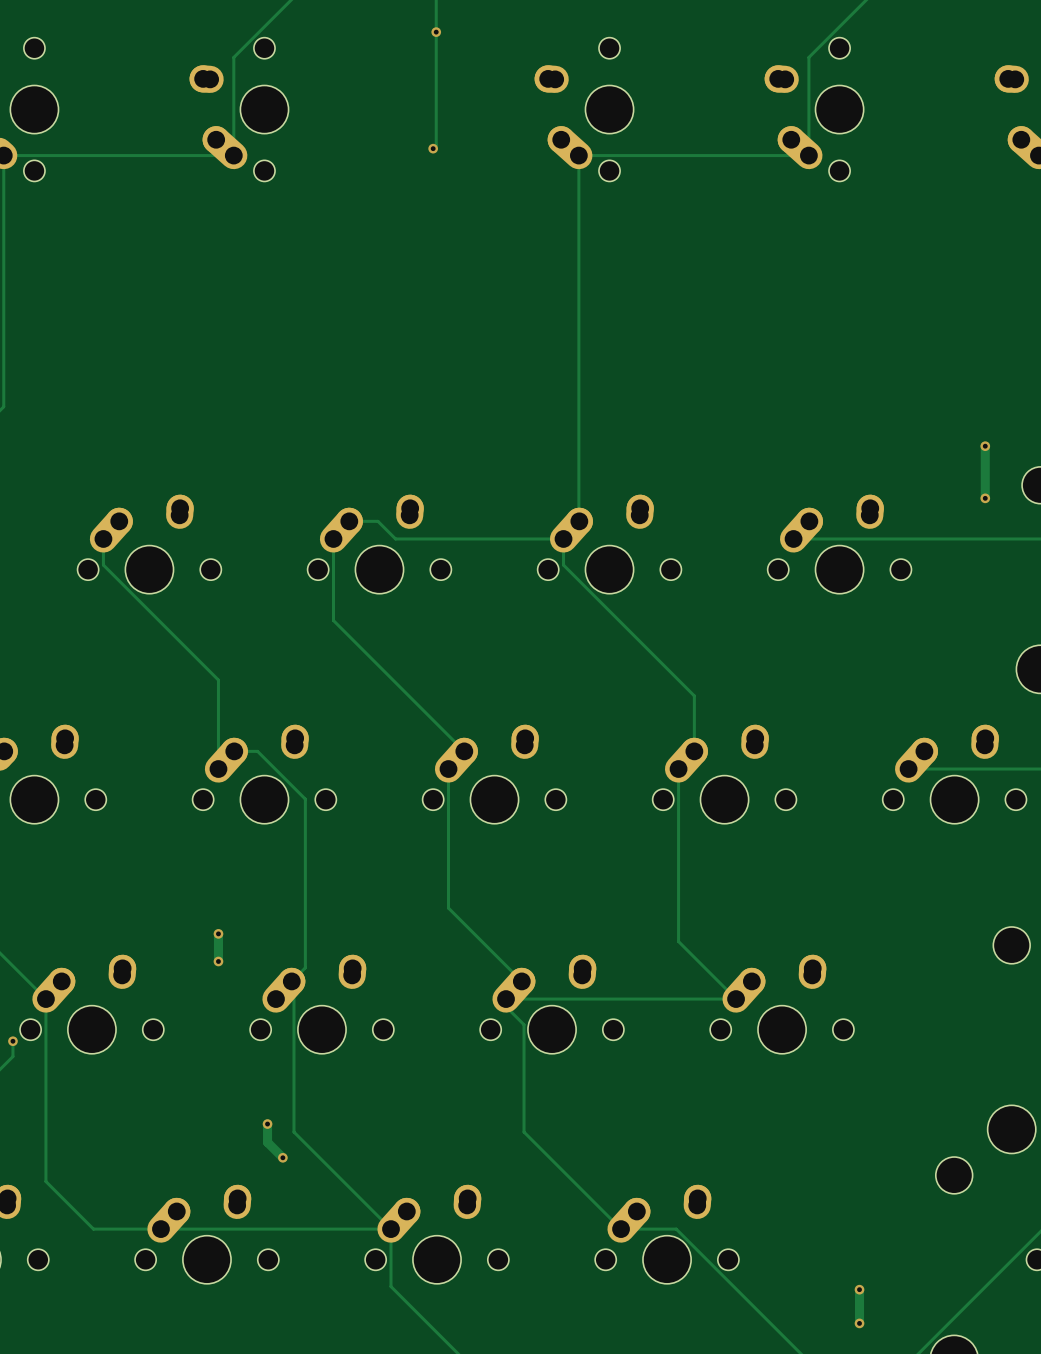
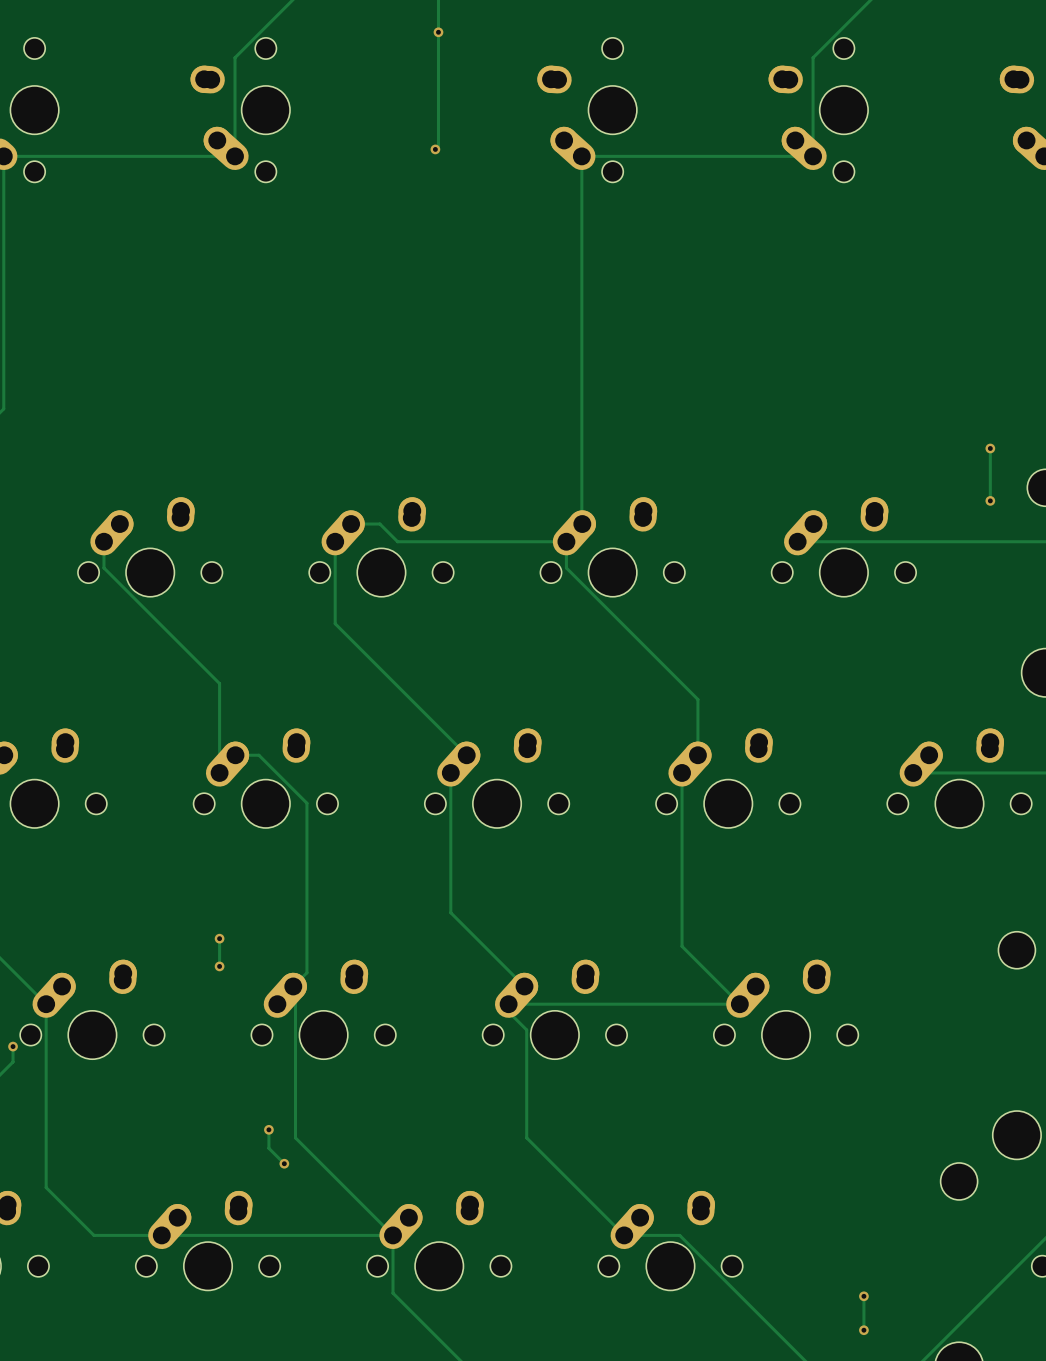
track width: thick (985, 446) (985, 498) -> thin (990, 448) (990, 500)
track width: thick (218, 933) (218, 961) -> thin (219, 938) (219, 966)
track width: thick (267, 1124) (267, 1142) (282, 1157) -> thin (268, 1129) (268, 1148) (284, 1163)
track width: thick (859, 1289) (859, 1323) -> thin (863, 1296) (863, 1330)

